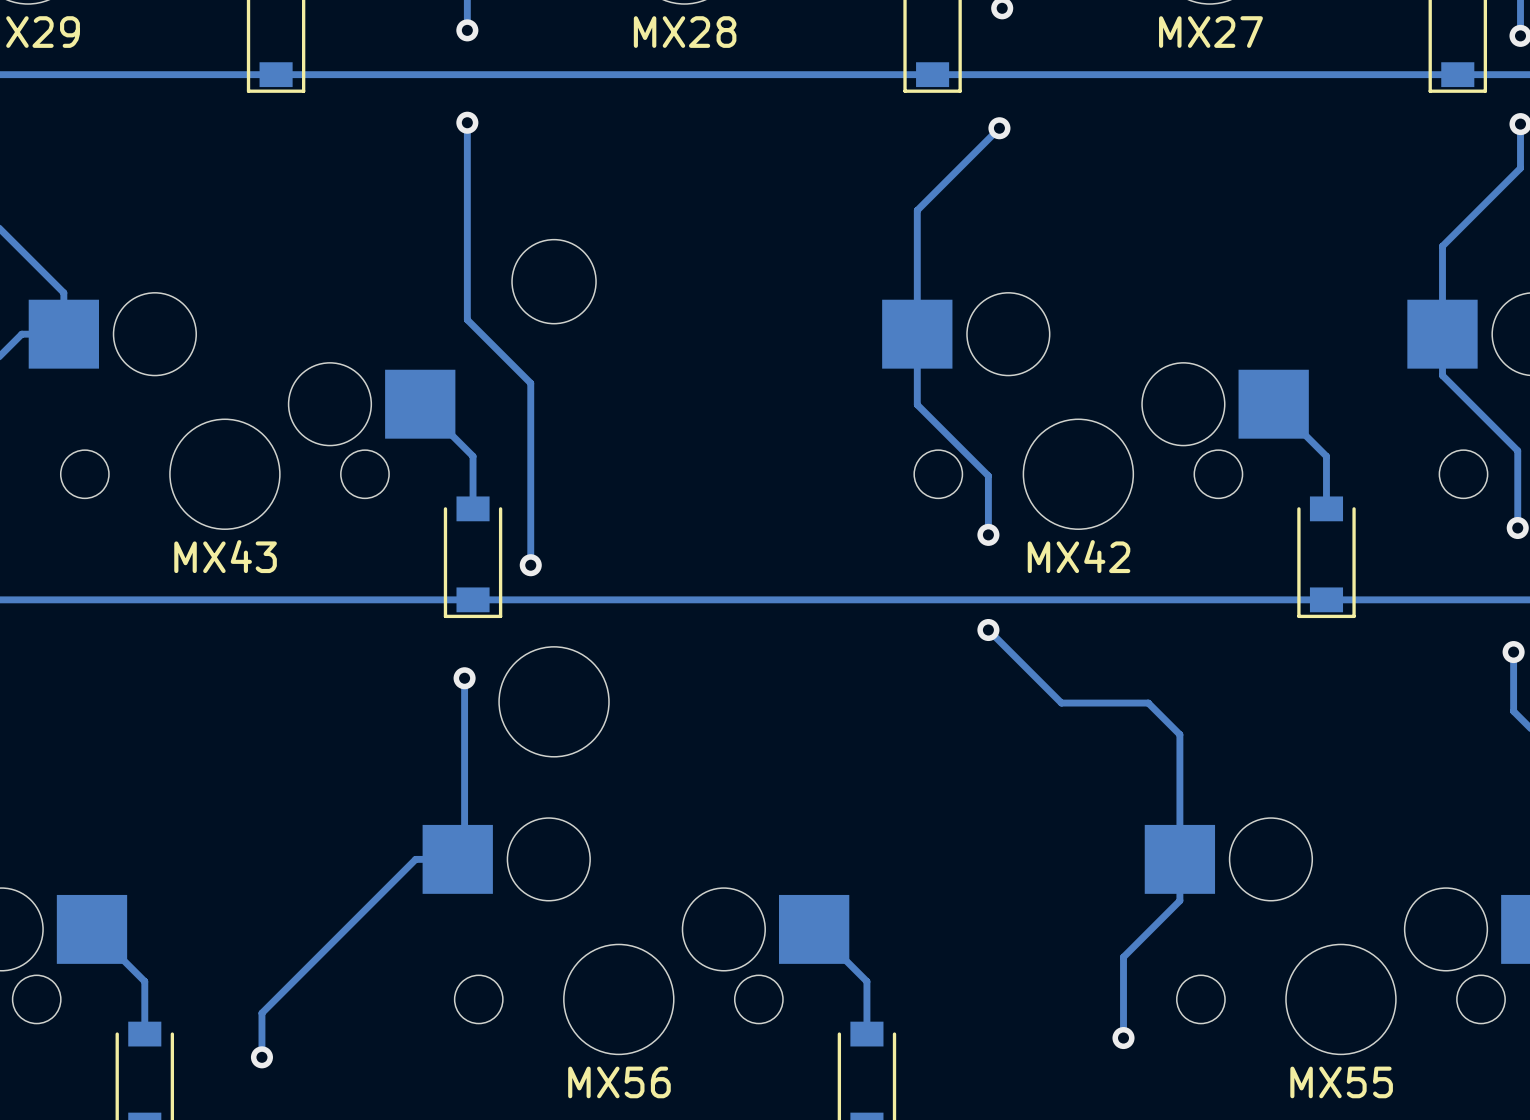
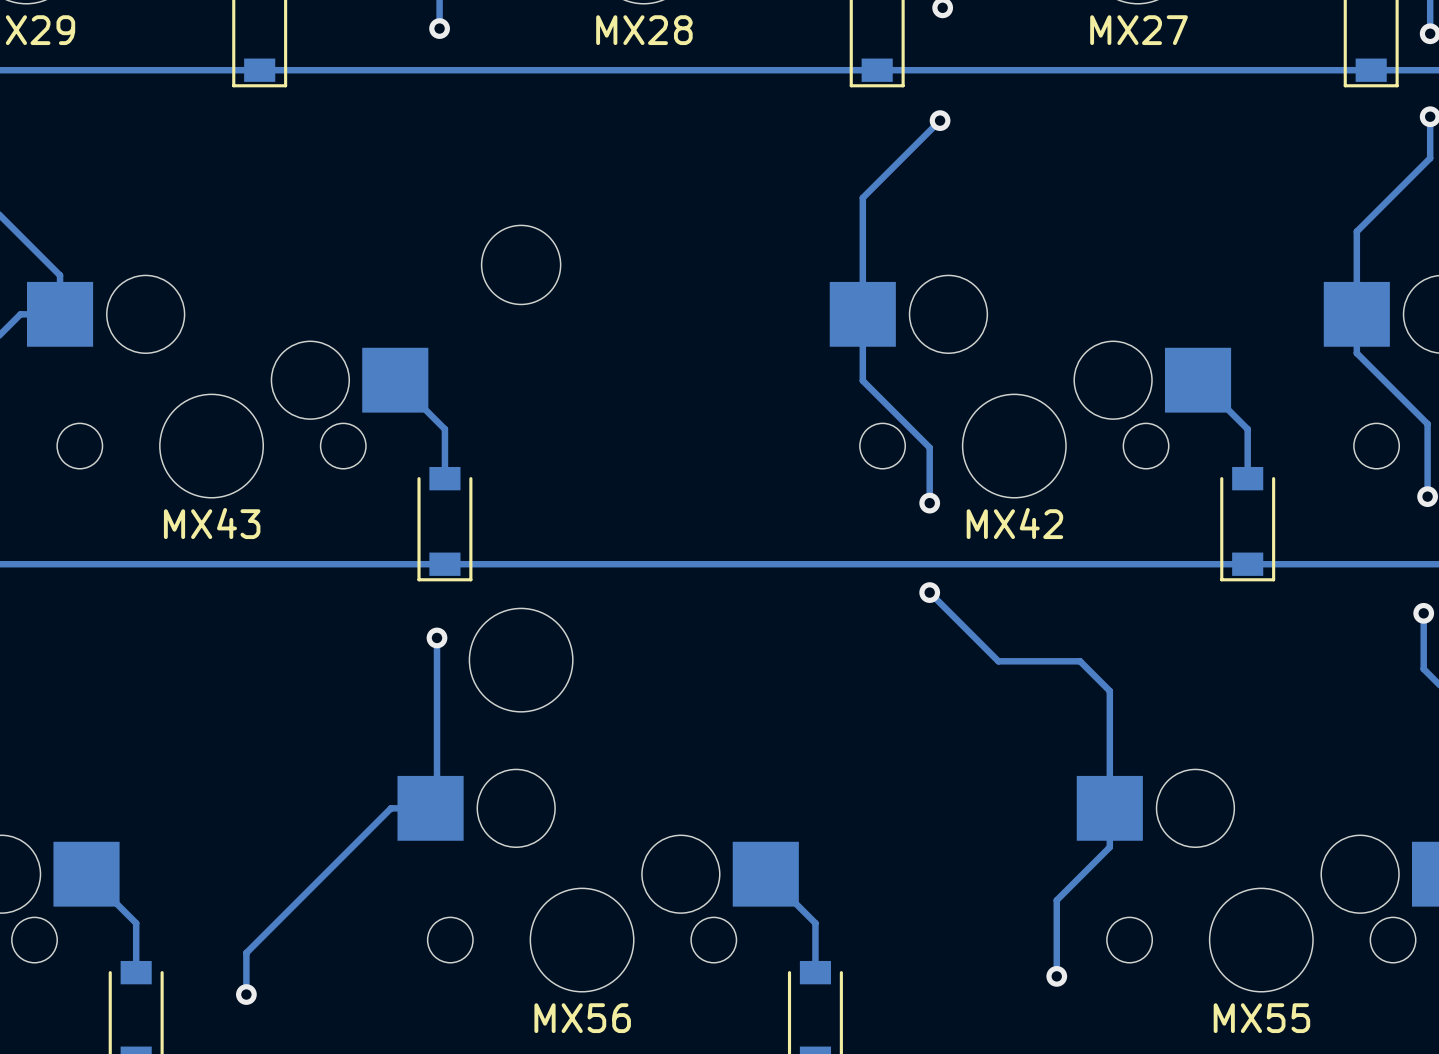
track: (467, 122) (467, 319) (530, 383) (530, 565) -> none
via: (467, 122) -> none
via: (530, 565) -> none

